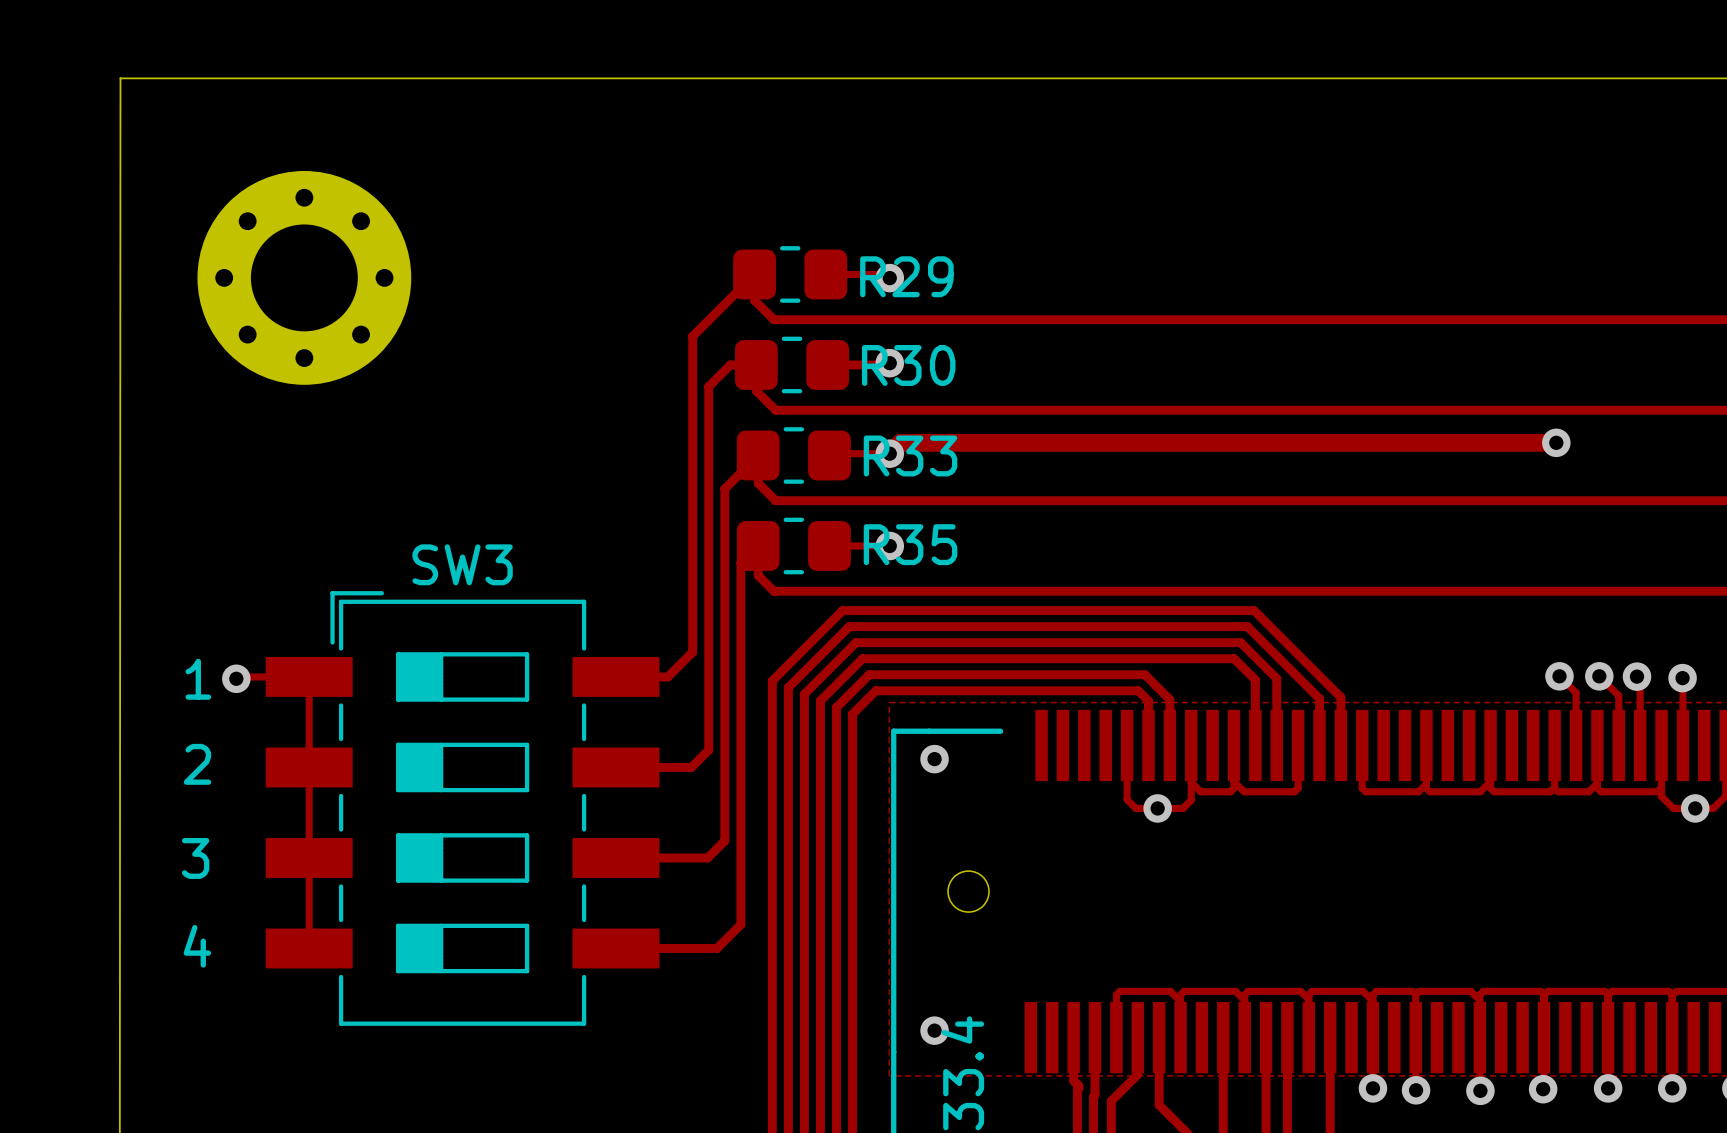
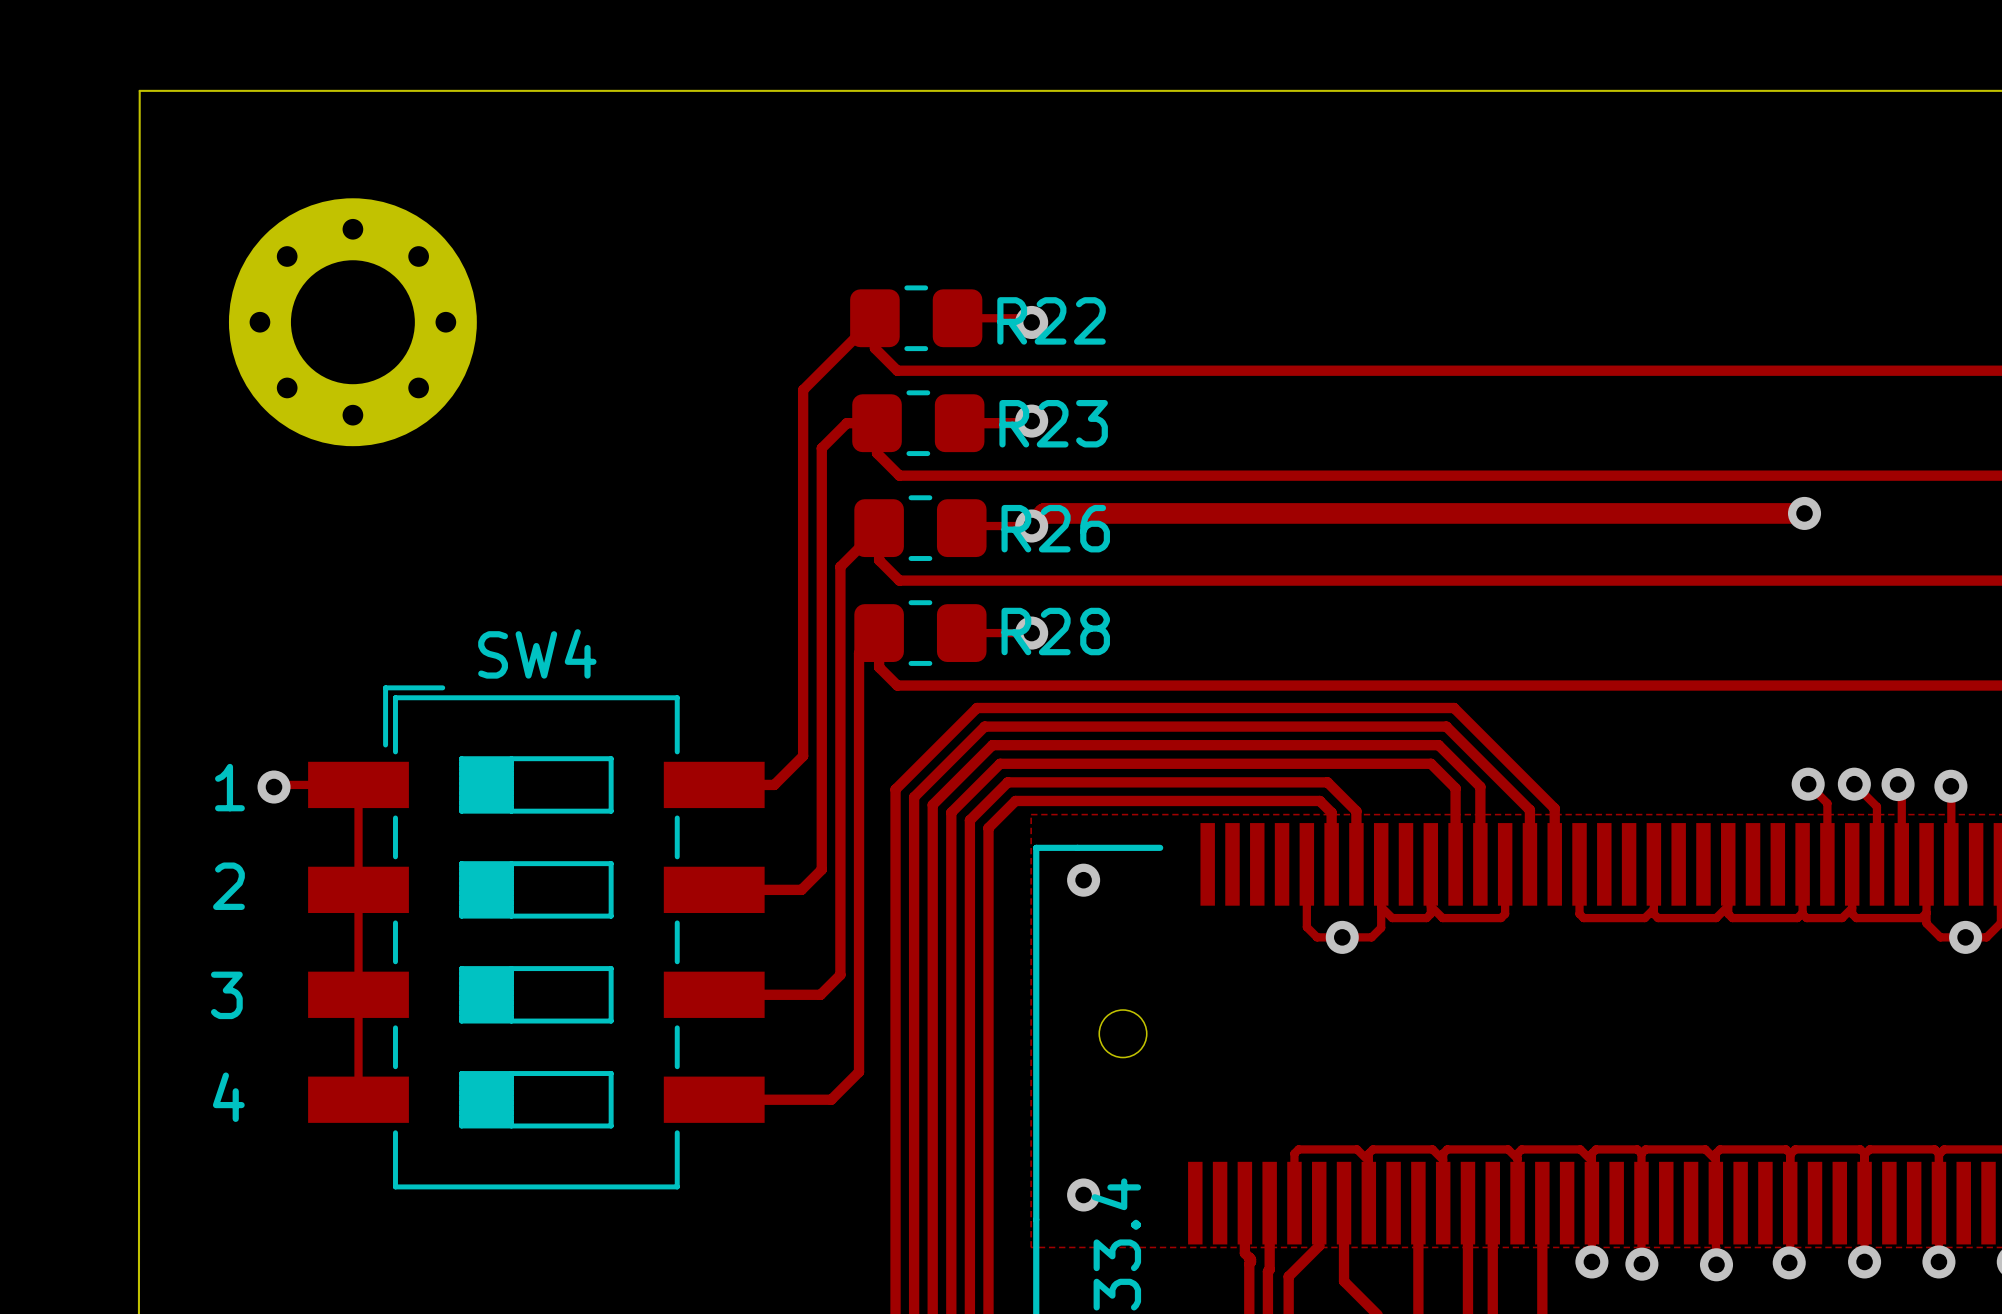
R29 name: R29 (906, 276) -> R22 (1051, 320)
R30 name: R30 (908, 365) -> R23 (1053, 423)
R33 name: R33 (910, 455) -> R26 (1055, 528)
R35 name: R35 (910, 544) -> R28 (1055, 631)
SW3 name: SW3 (462, 564) -> SW4 (537, 653)

